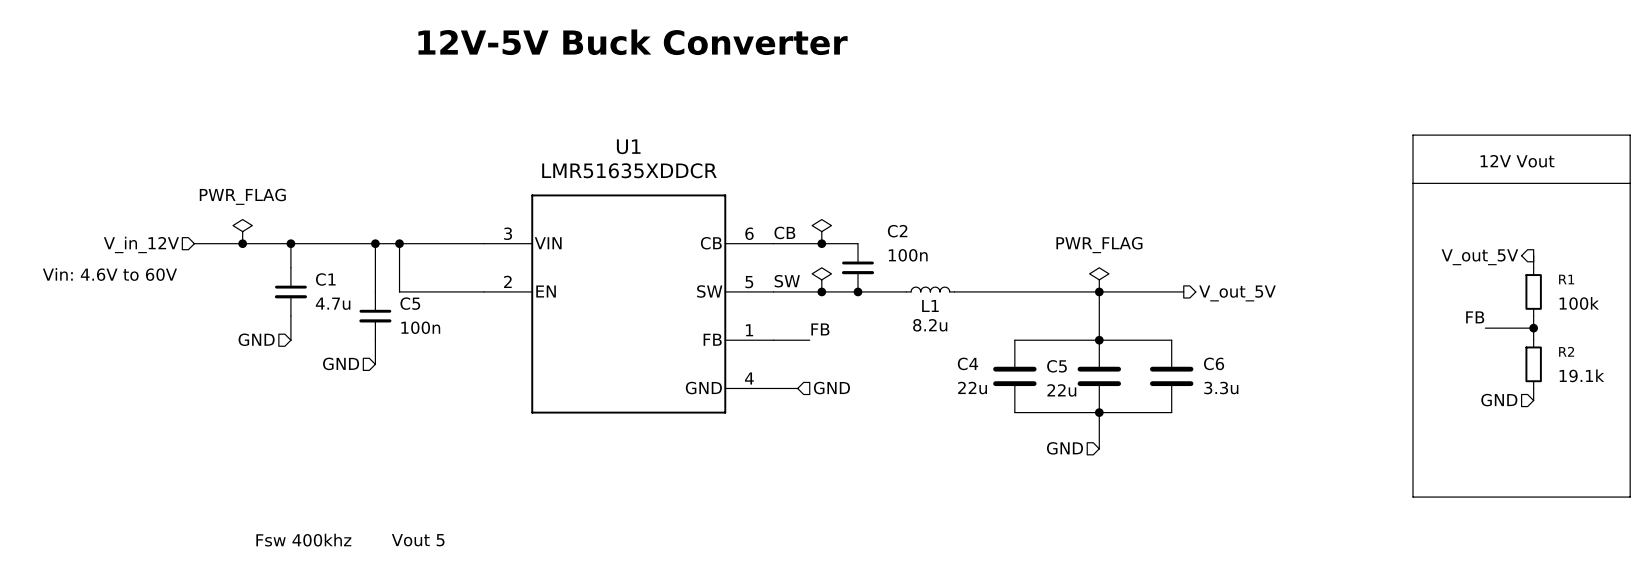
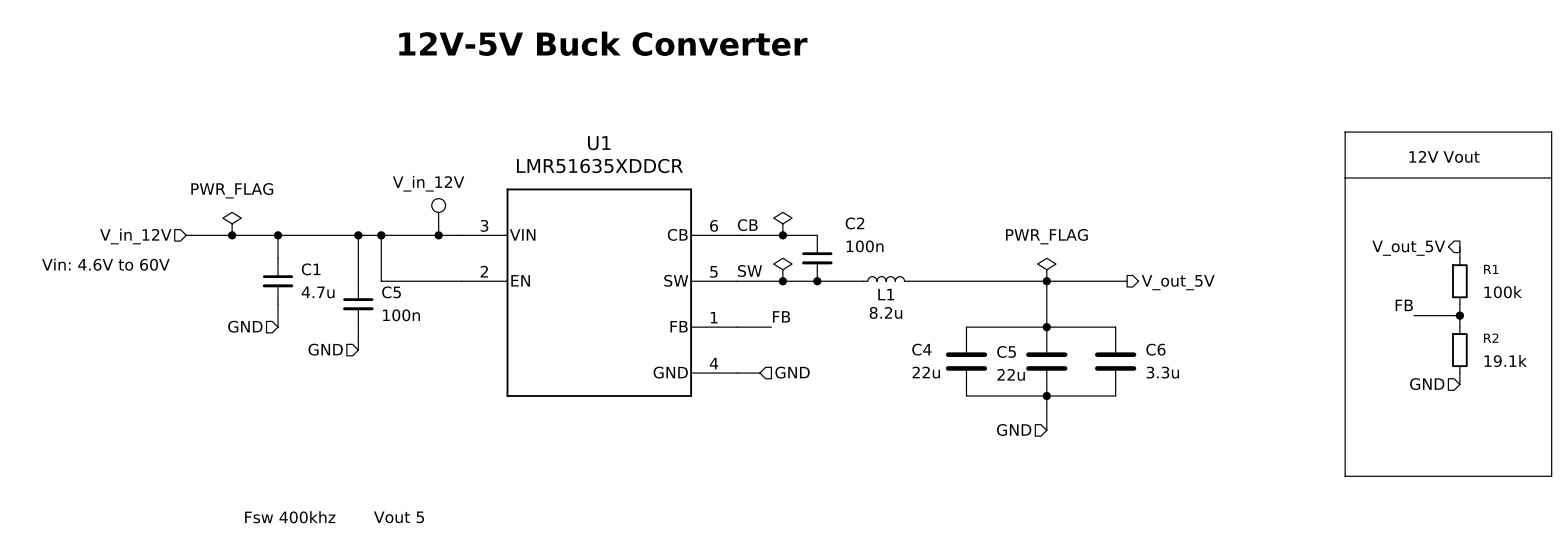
part: none -> V_in_12V (438, 216)
junction: none -> (438, 235)

